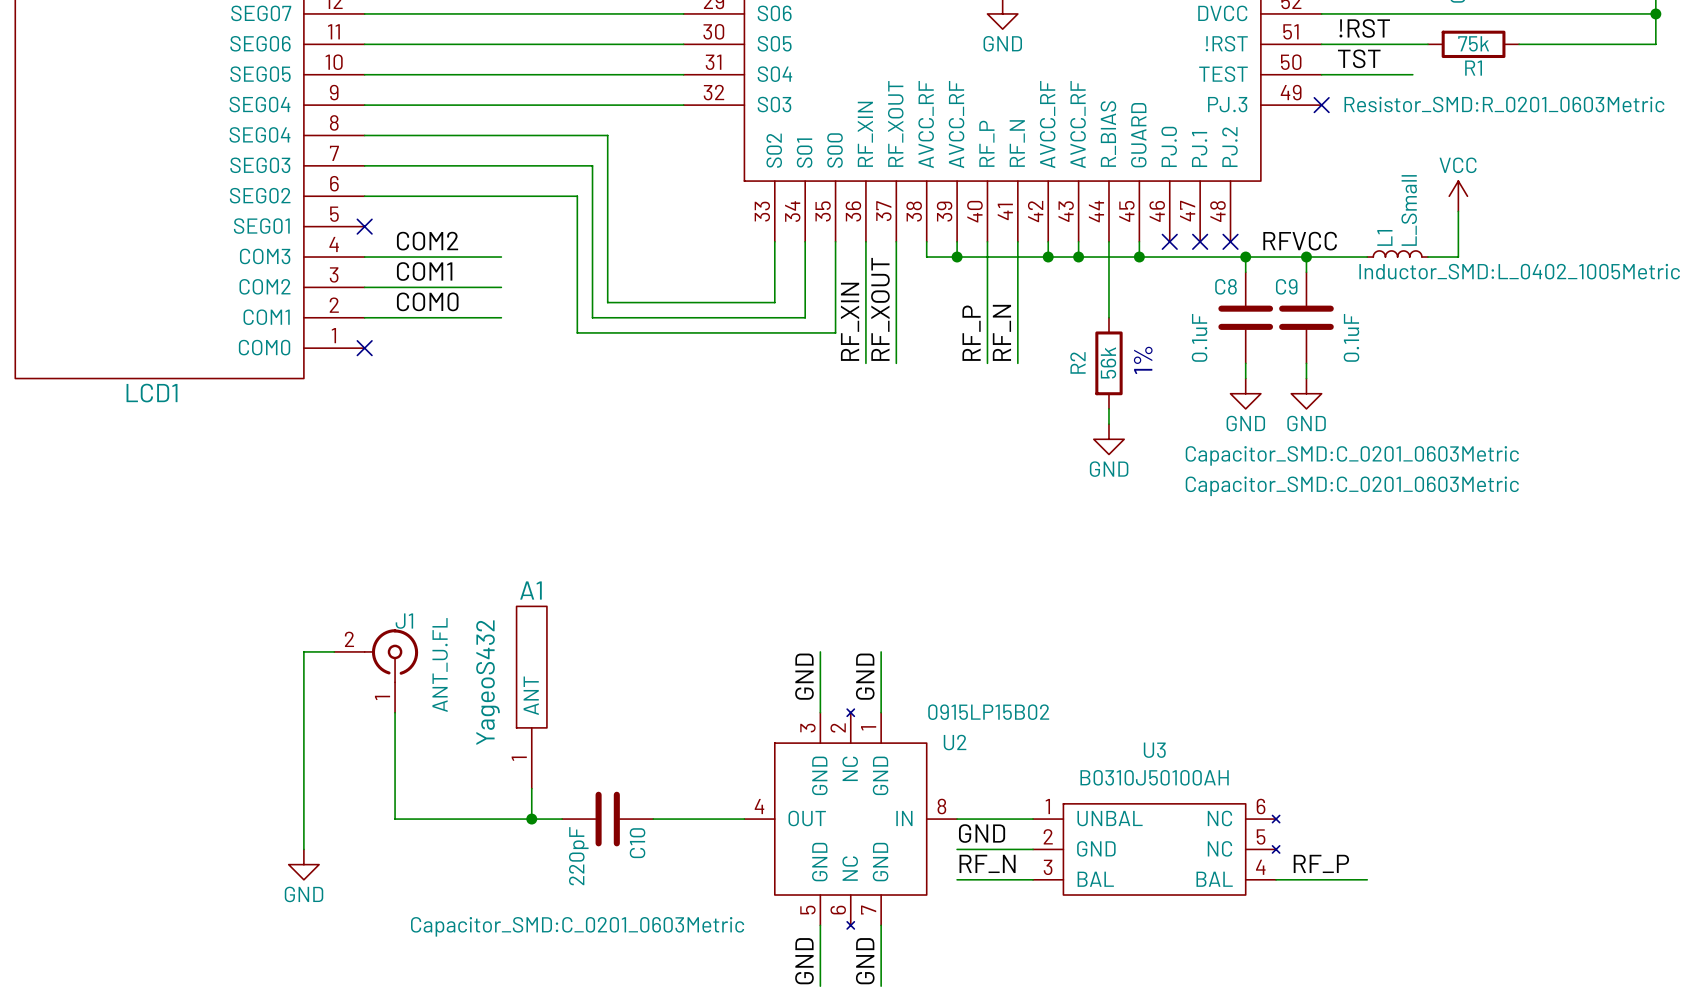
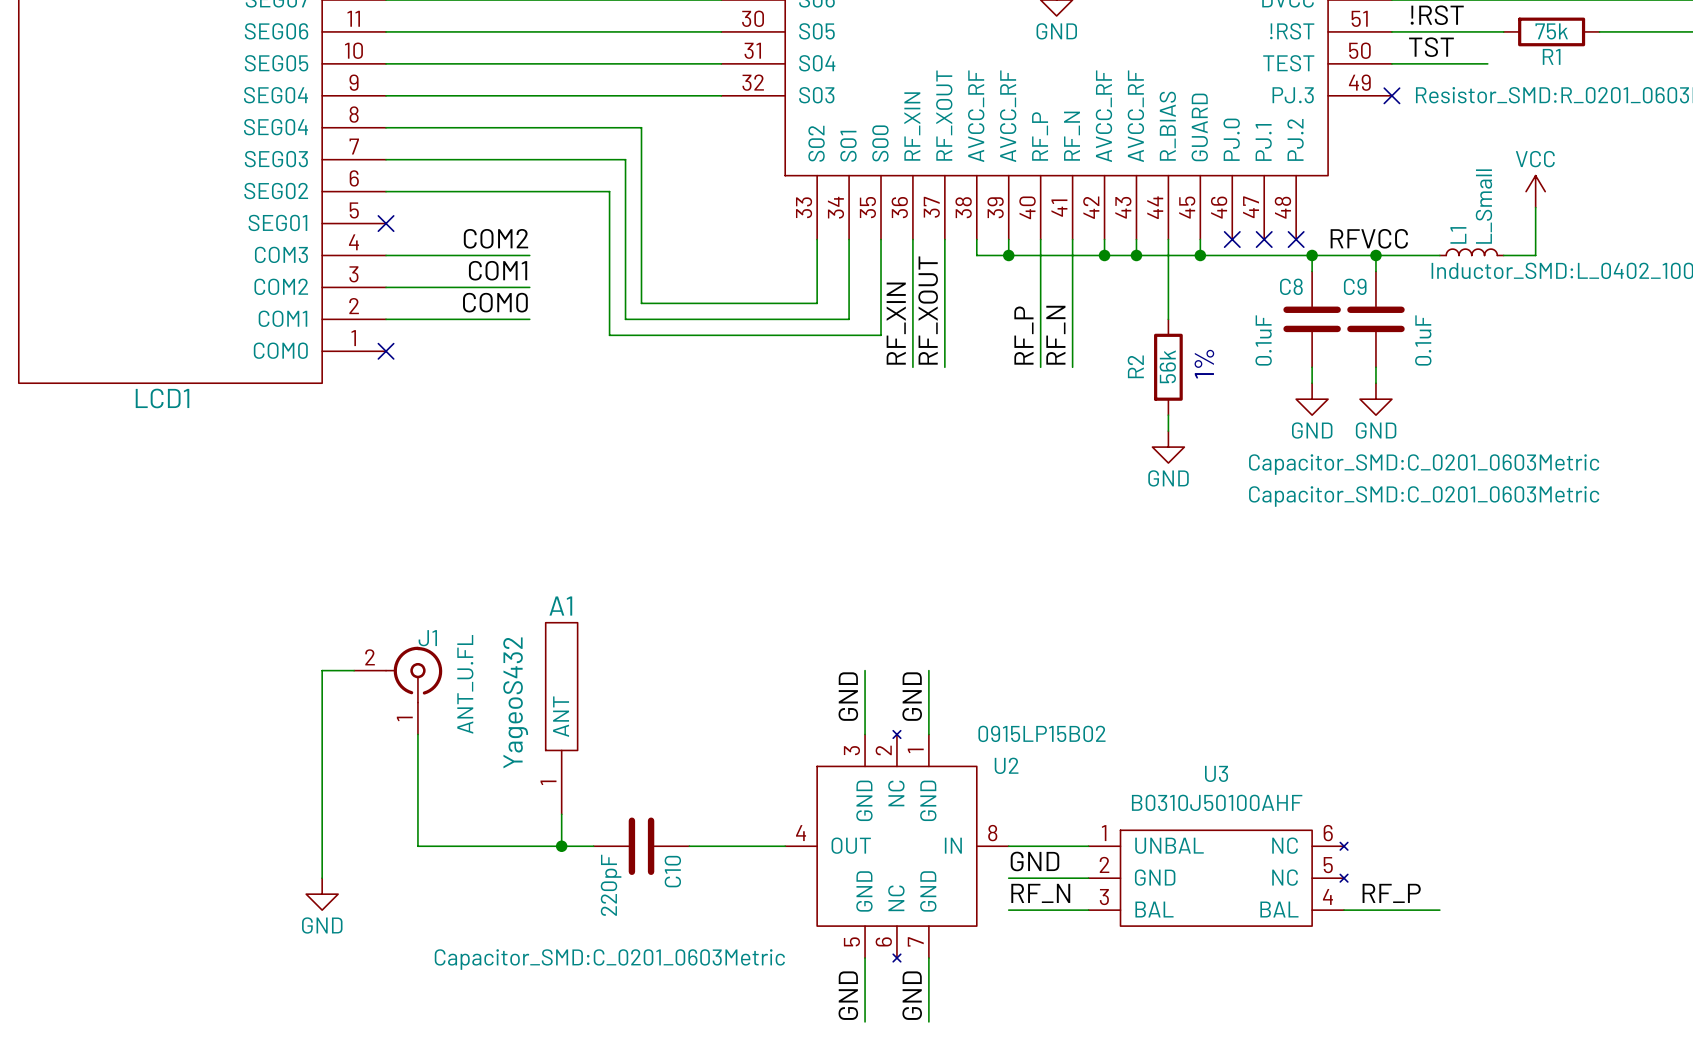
label position: COM2 (427, 241) -> COM2 (495, 238)
label position: COM1 (424, 271) -> COM1 (498, 270)
label position: COM0 (427, 301) -> COM0 (495, 302)
U3 value: B0310J50100AH (1154, 777) -> B0310J50100AHF (1217, 802)

